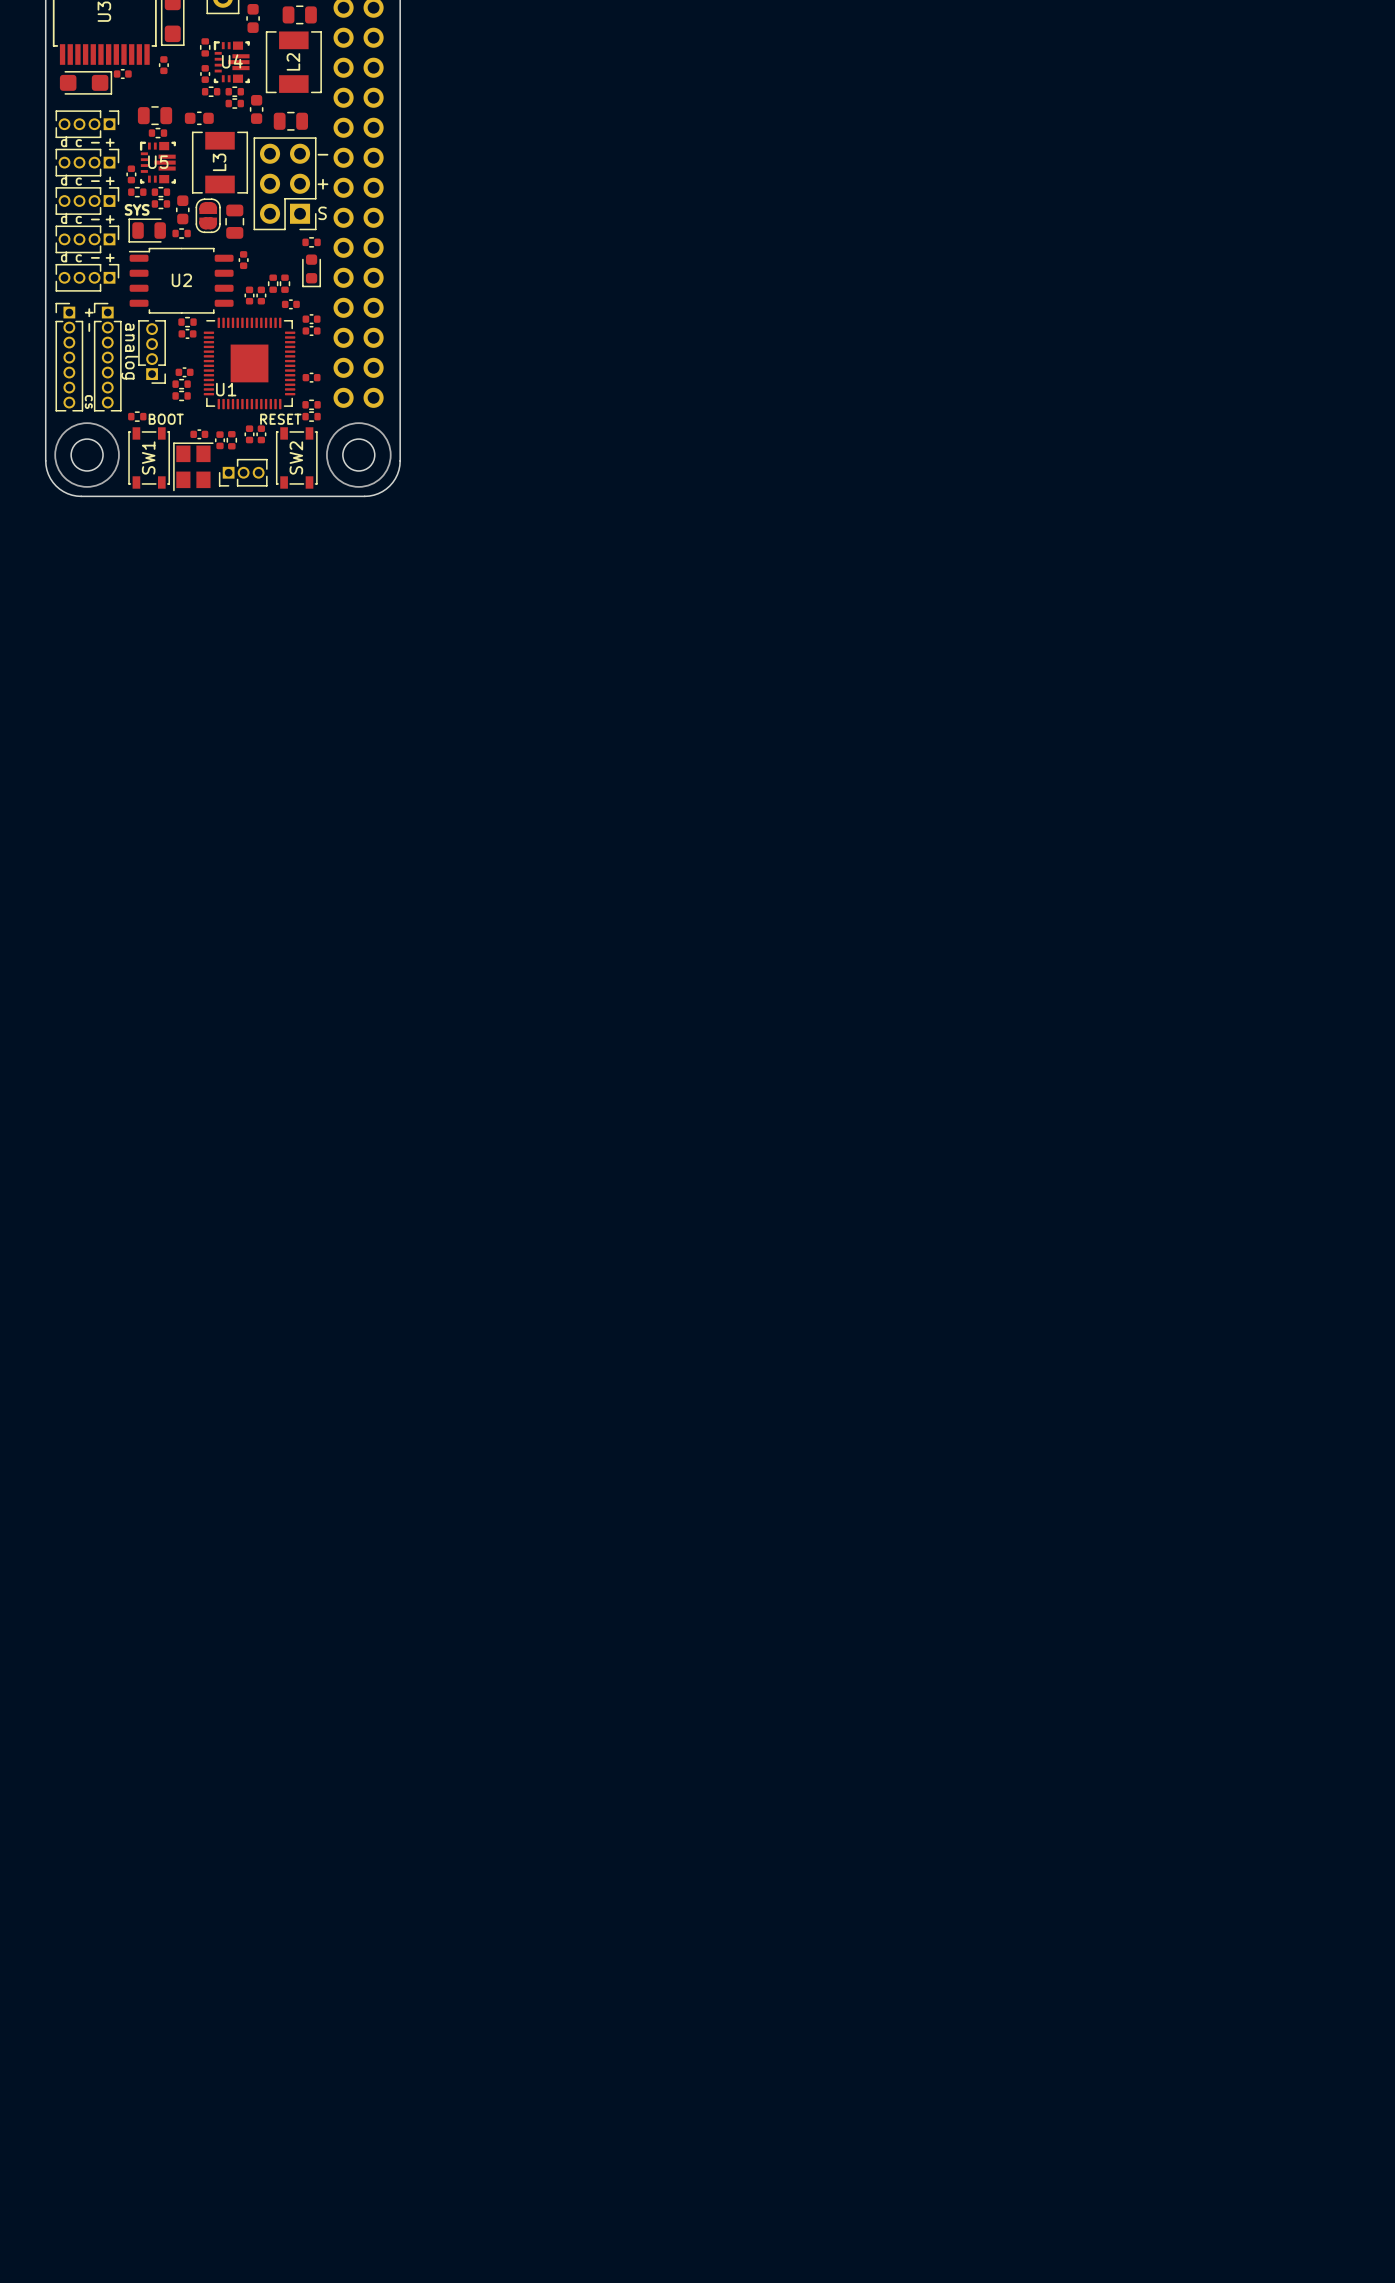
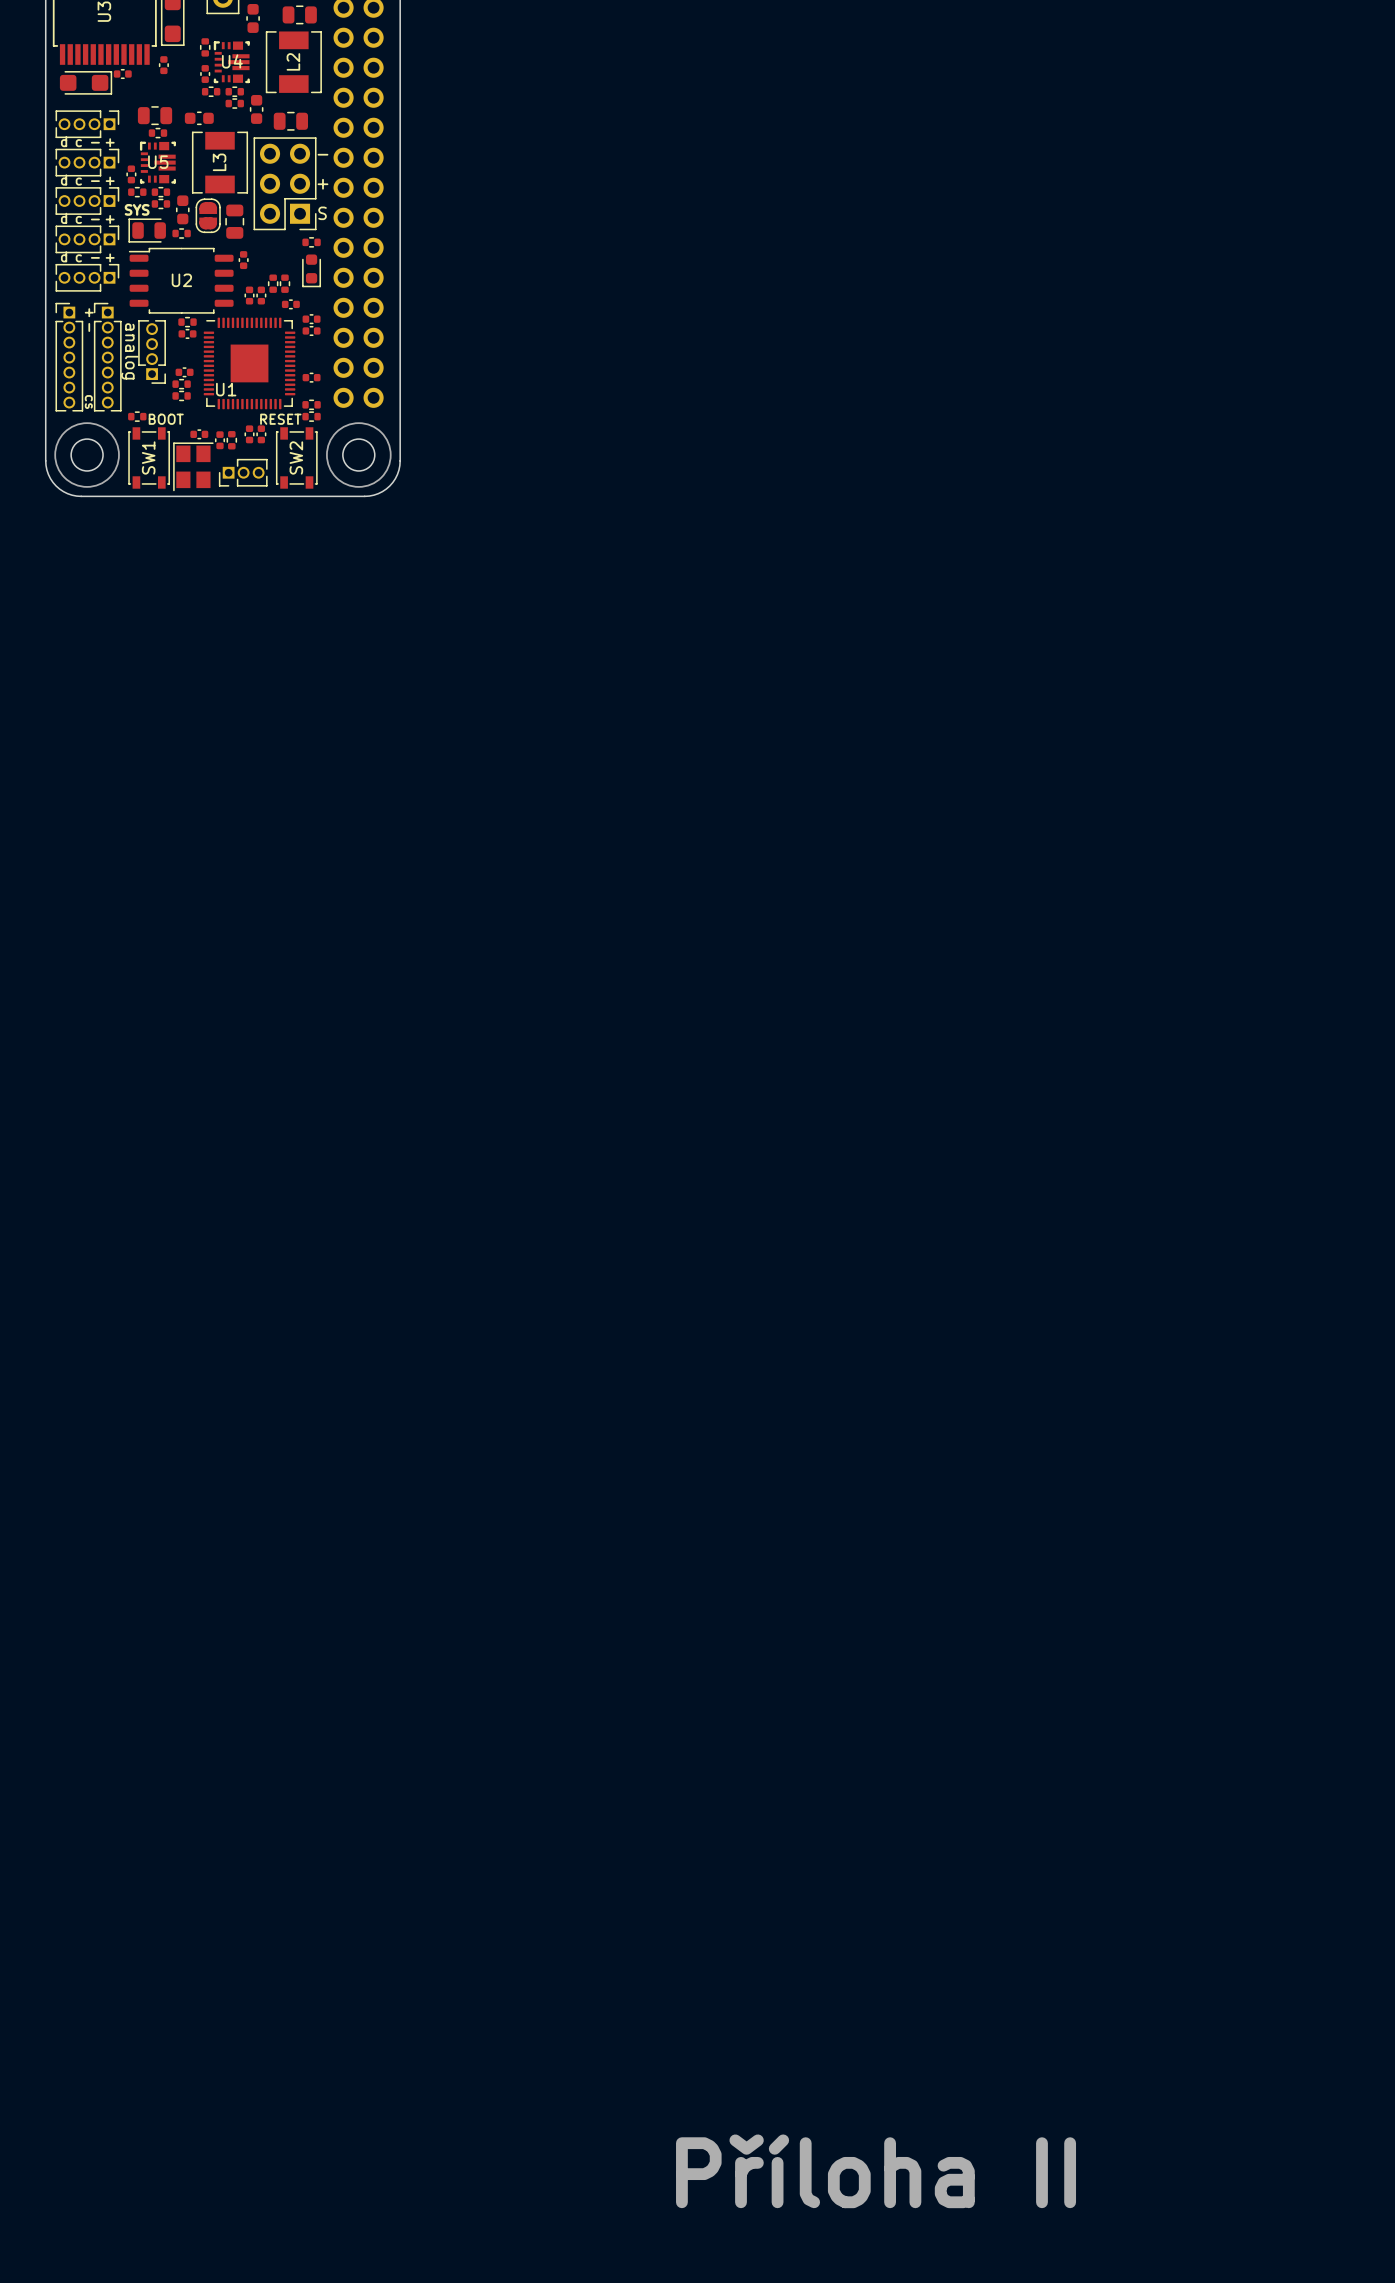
text: none -> Příloha II (876, 2171)

